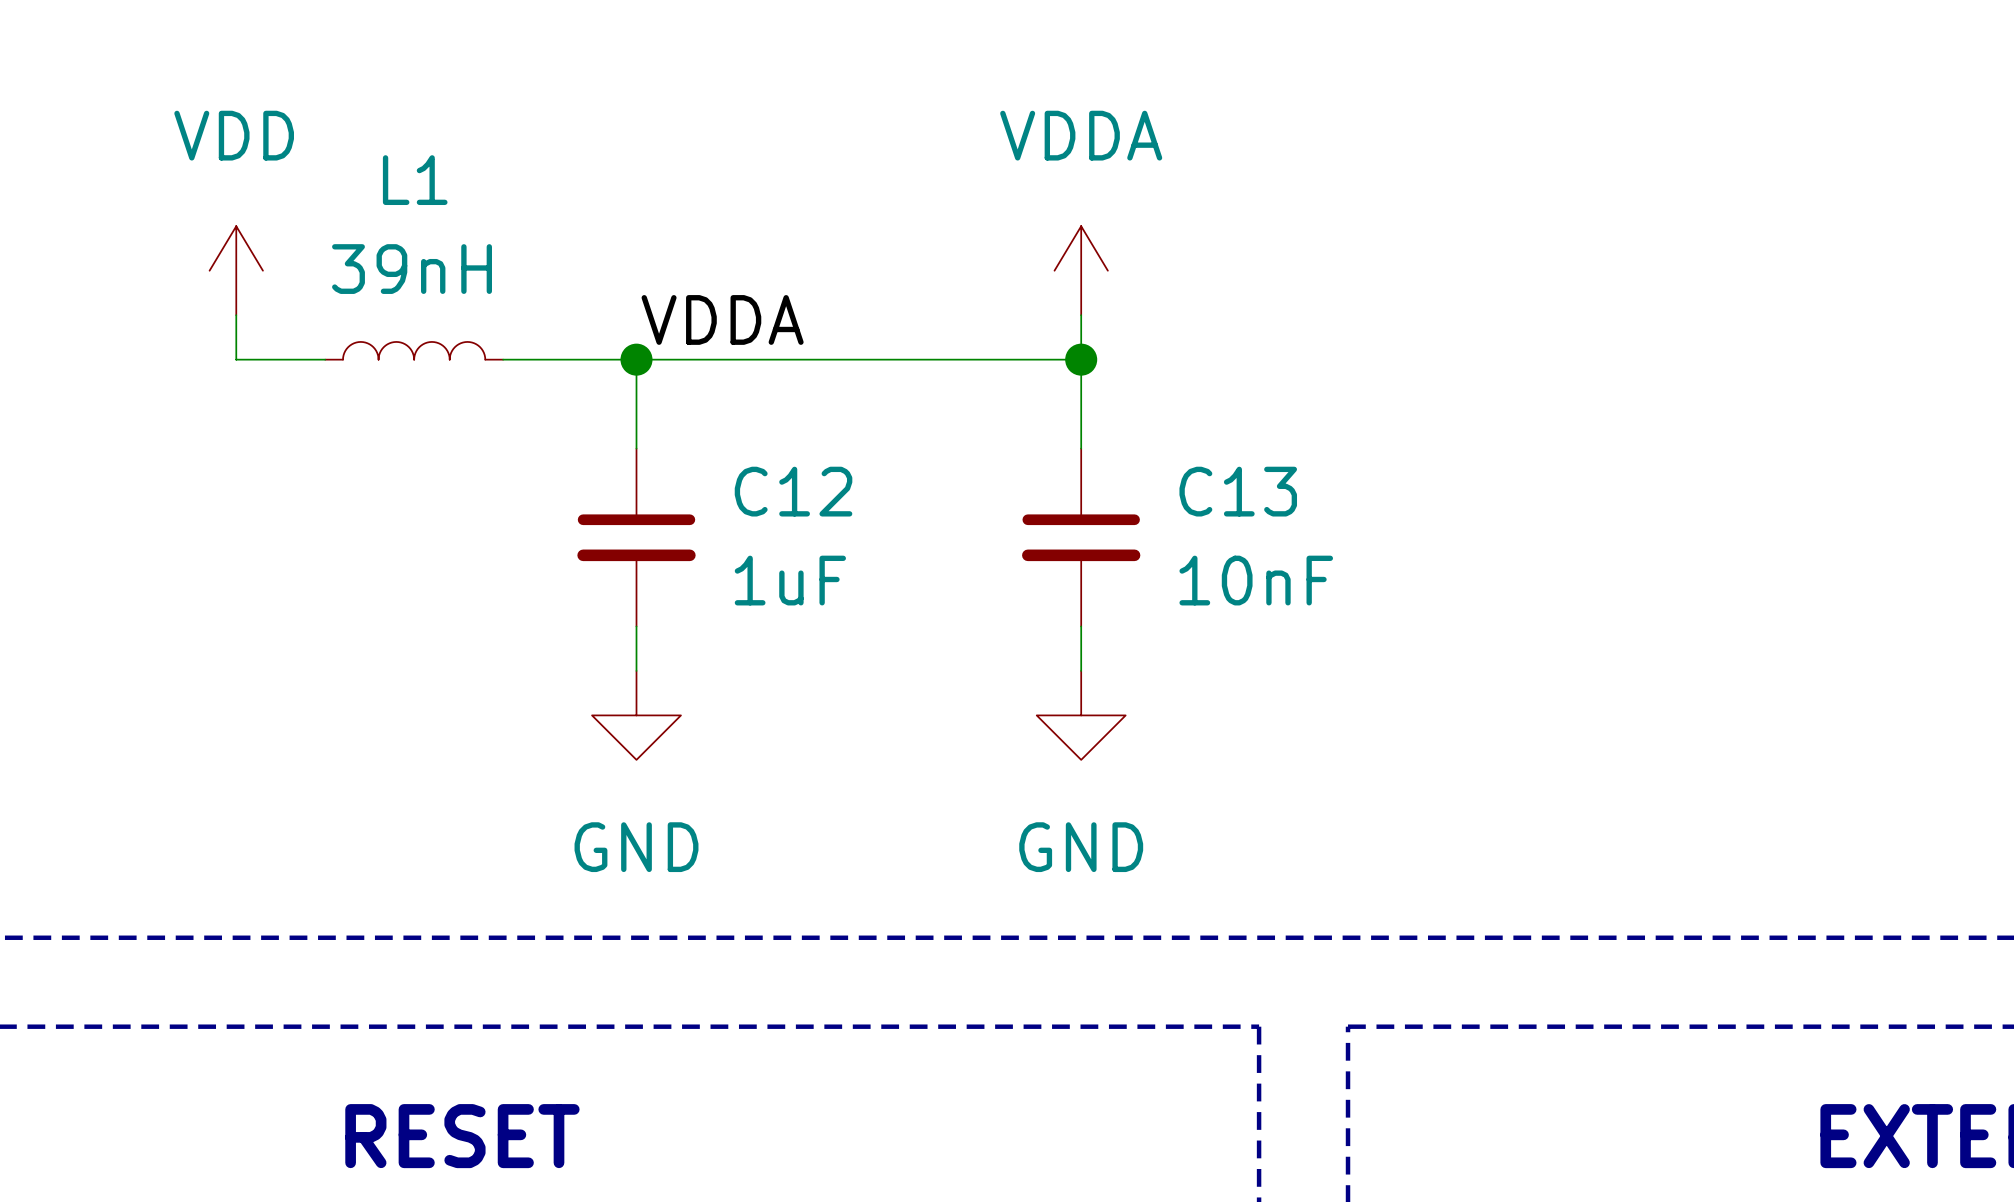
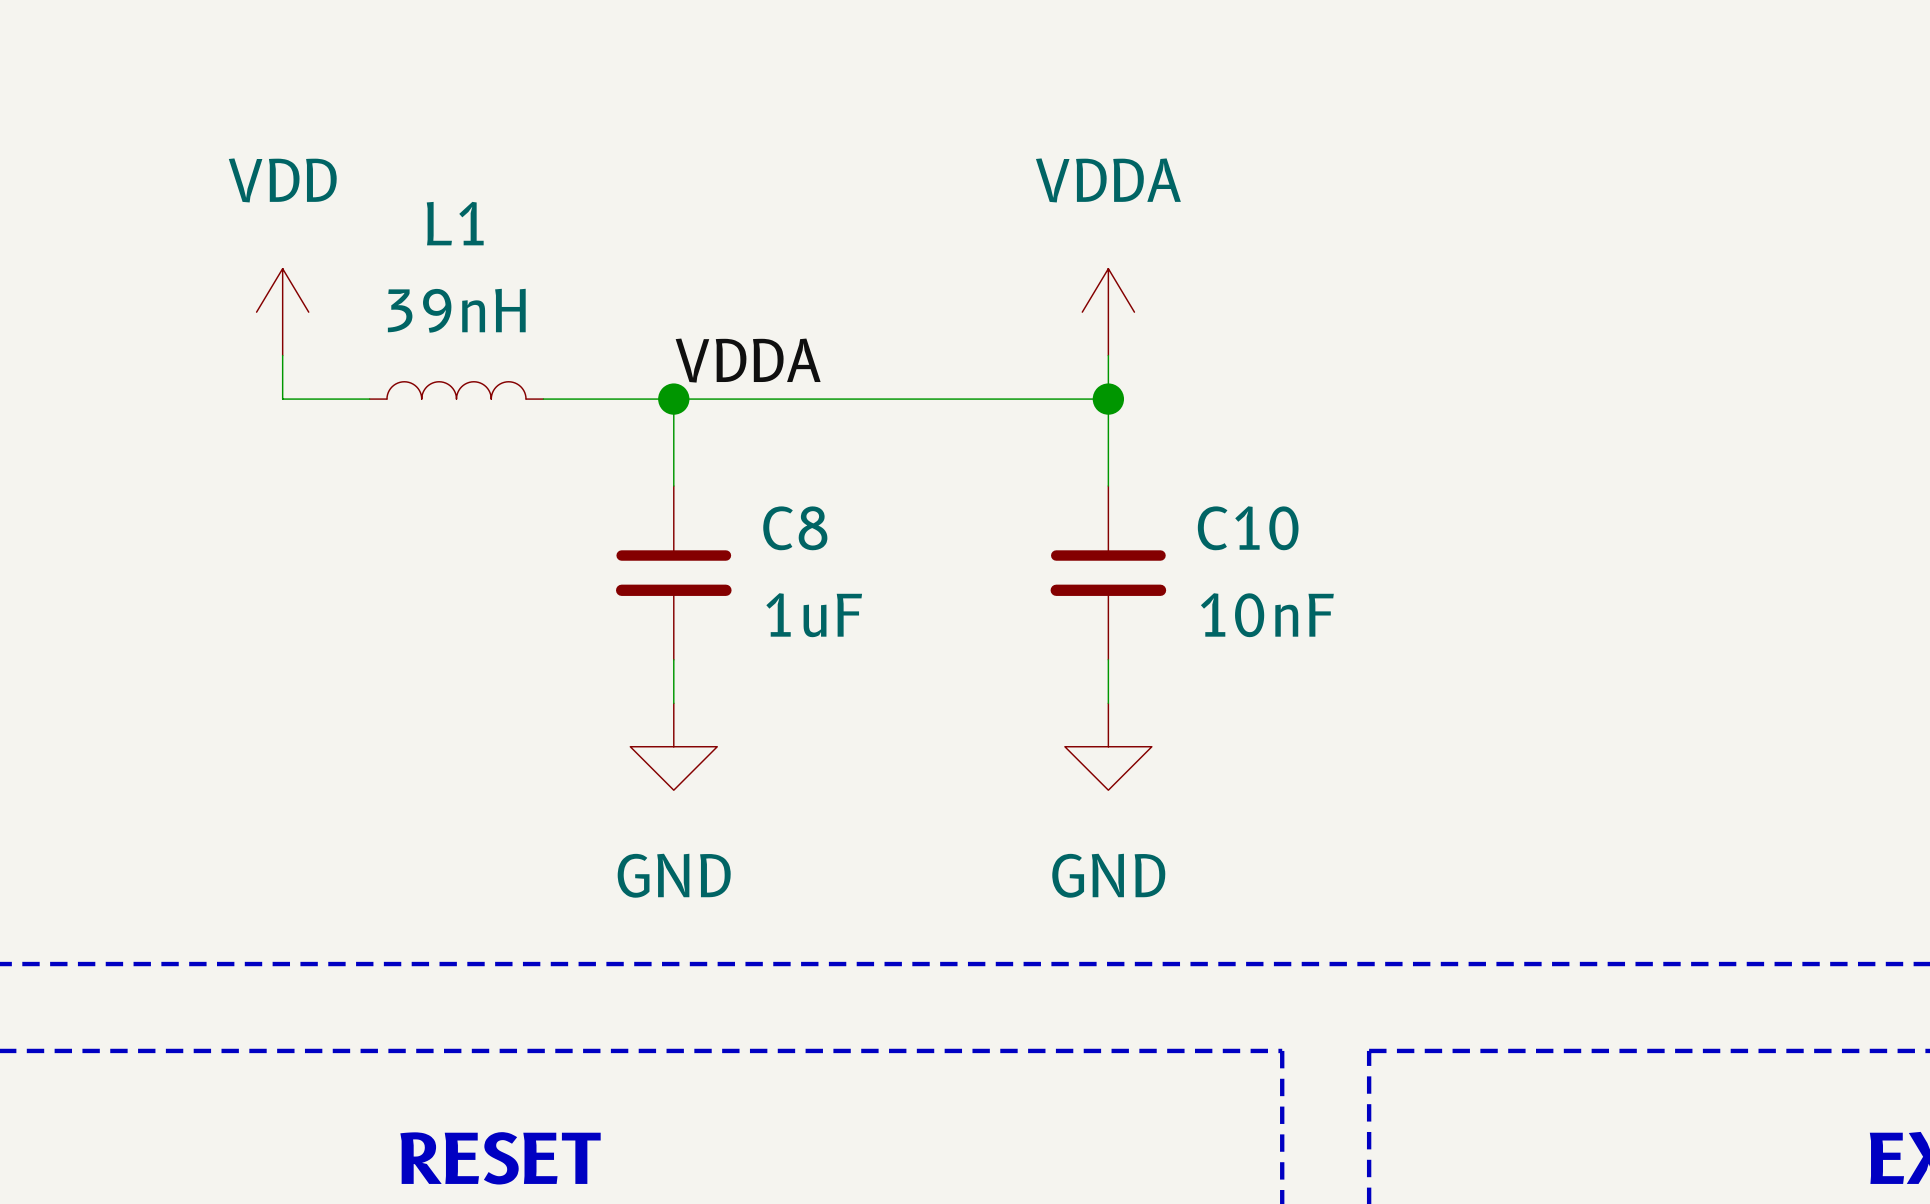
C12 name: C12 (793, 491) -> C8 (795, 528)
C13 name: C13 (1238, 491) -> C10 (1248, 528)

